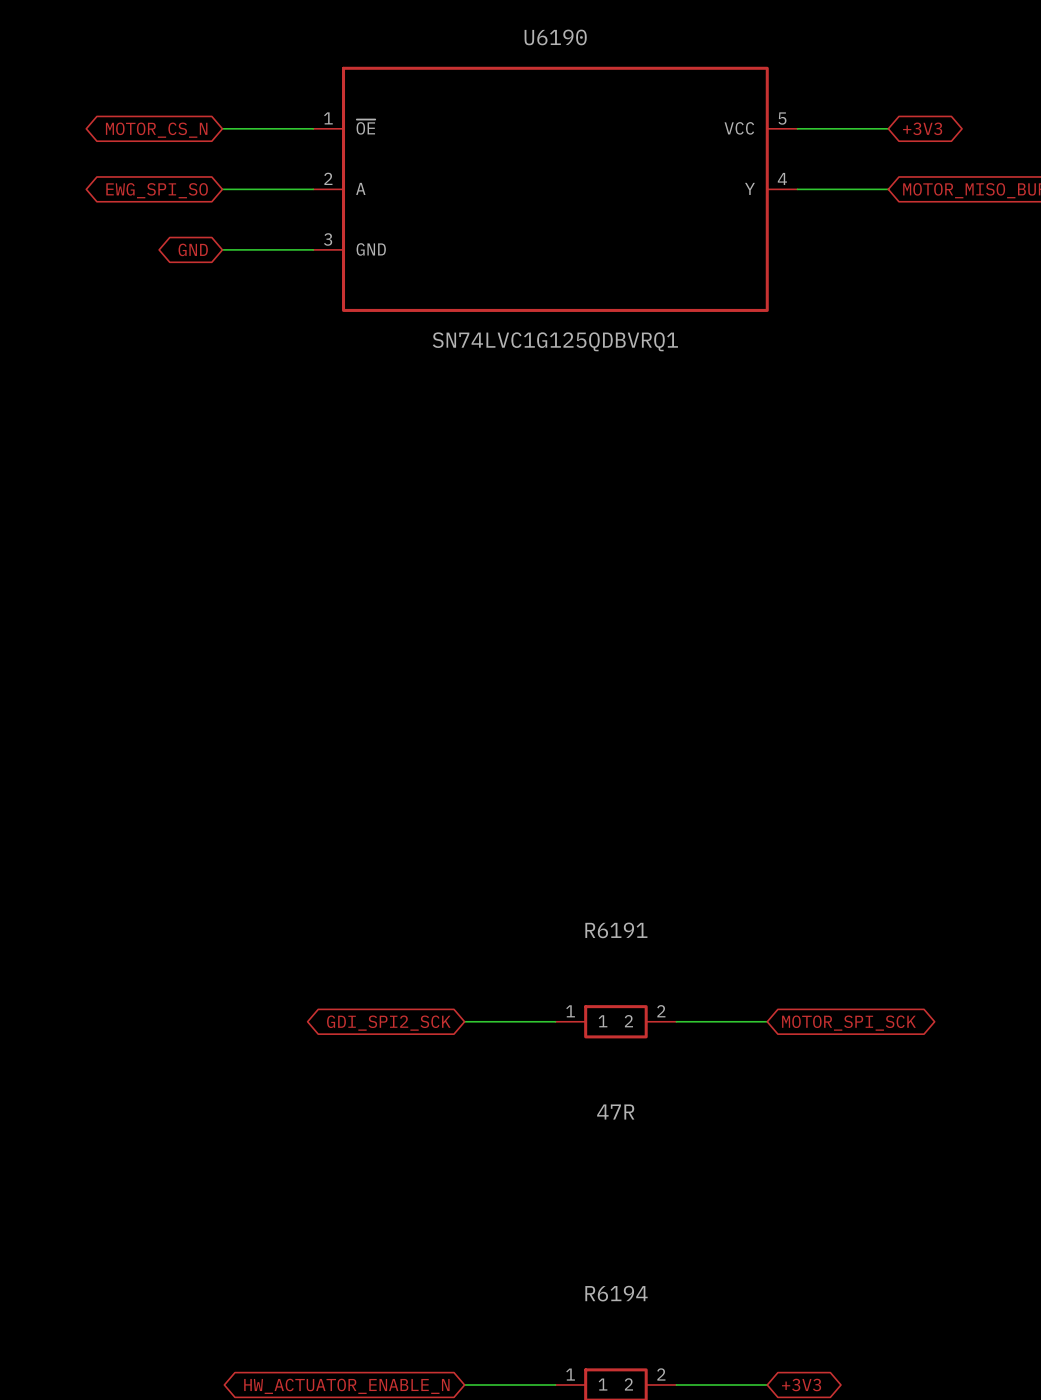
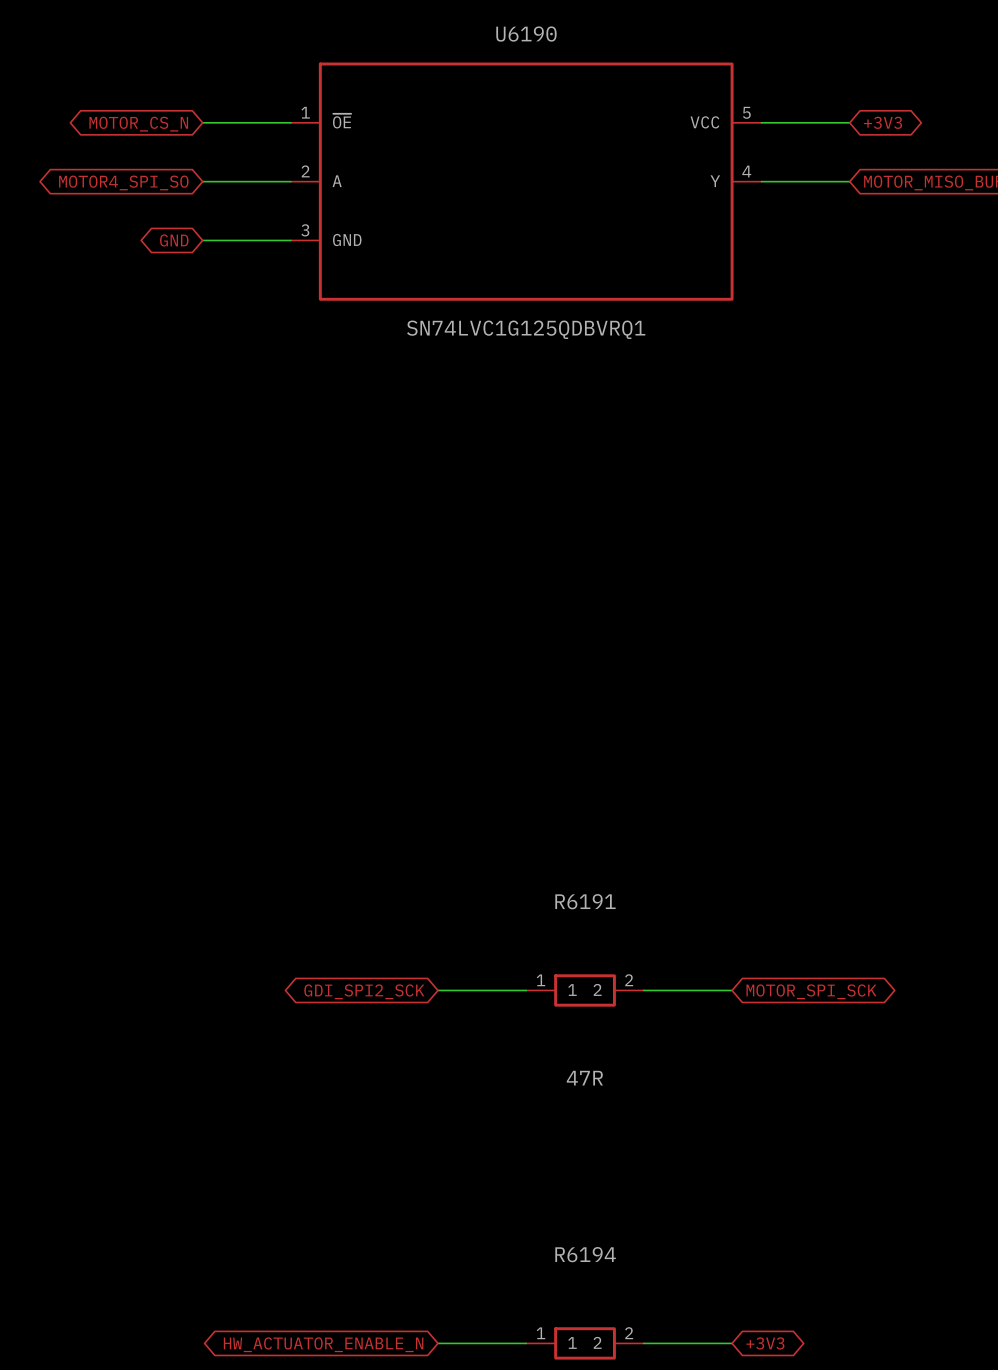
global label: EWG_SPI_SO (157, 190) -> MOTOR4_SPI_SO (123, 182)

